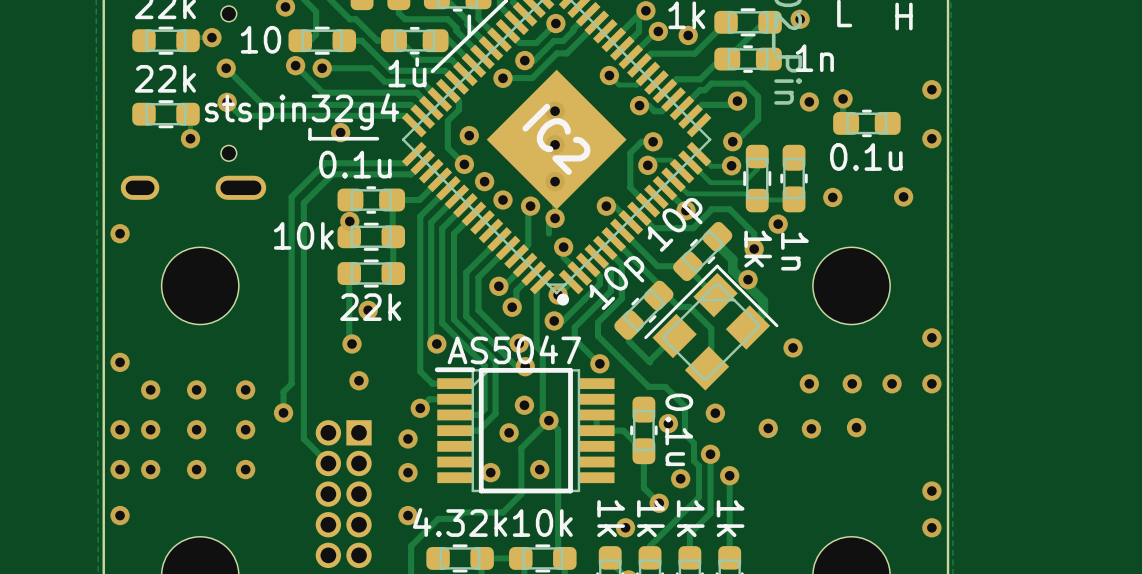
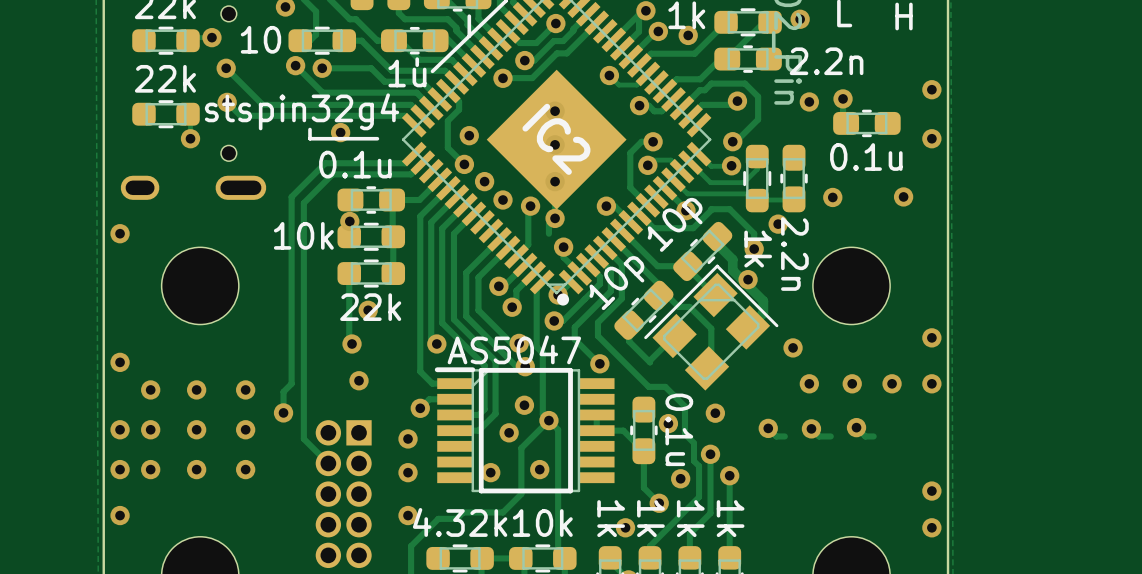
part value: 1n (814, 58) -> 2.2n (826, 61)
part value: 1n (794, 251) -> 2.2n (794, 254)
track: none -> (856, 427) (865, 436) (873, 436)
track: none -> (768, 428) (776, 436) (784, 436)
track: none -> (811, 428) (819, 436) (830, 436)

